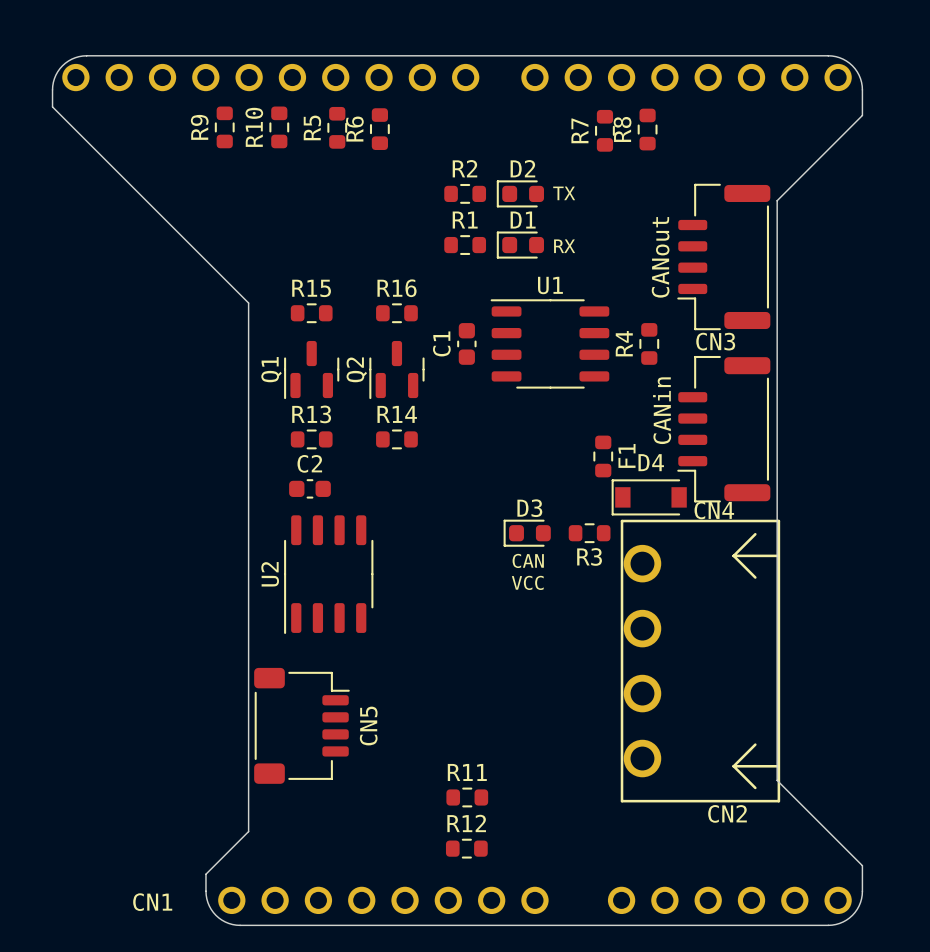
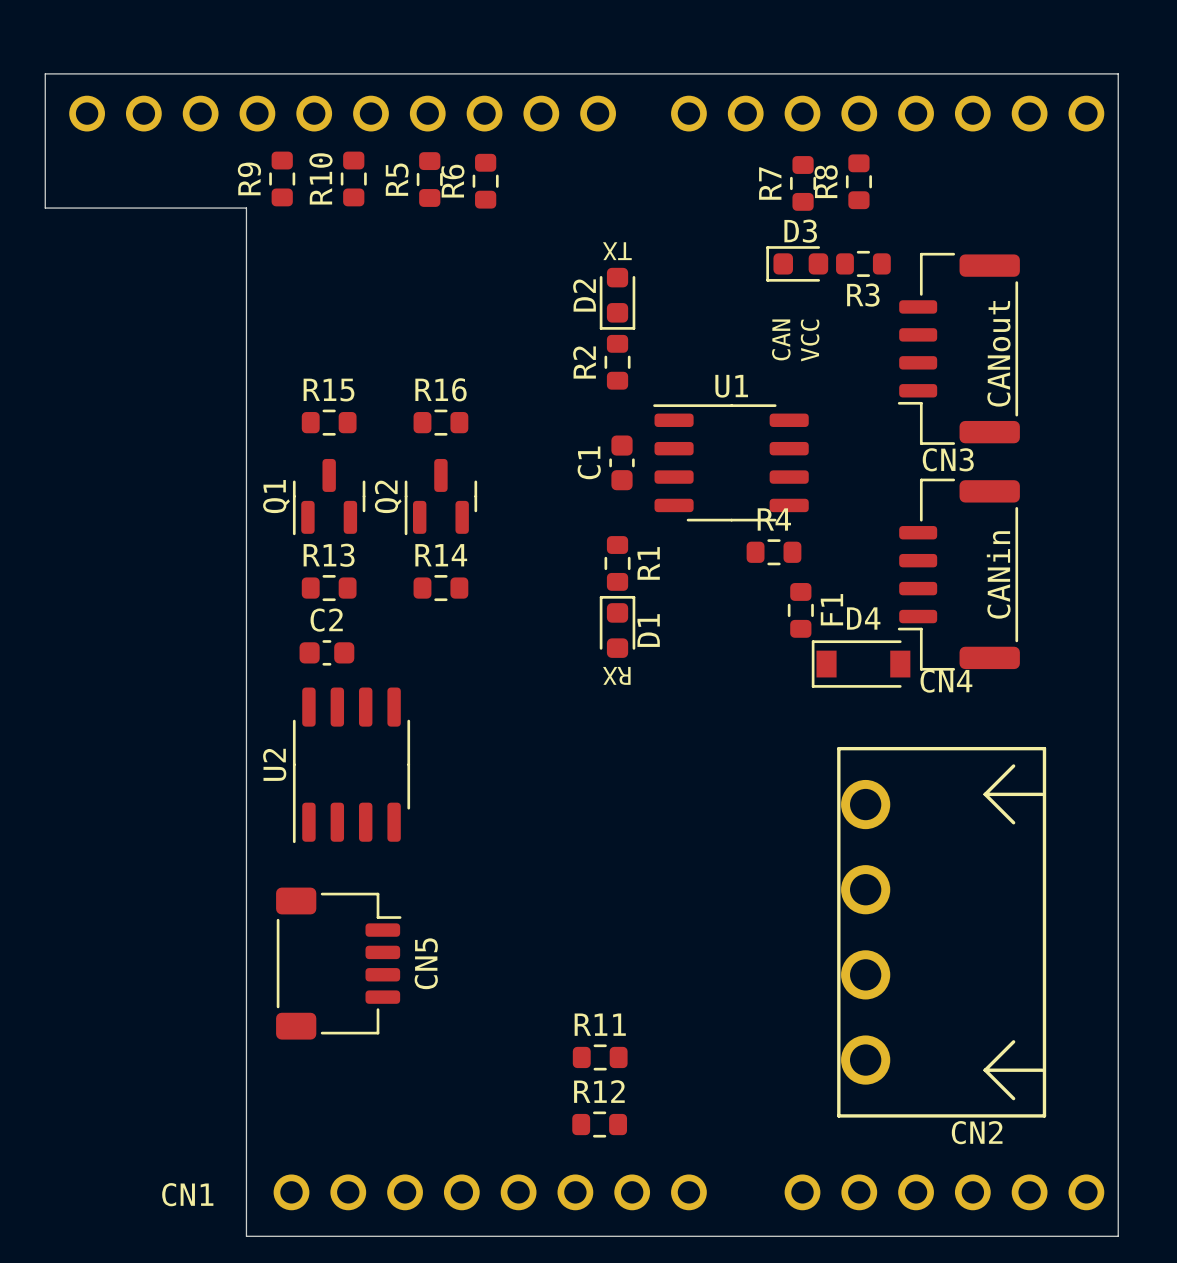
board edge: (862, 89) (859, 75) (852, 65) (839, 57) (828, 55) (86, 55) (75, 57) (62, 65) (54, 78) (52, 89) (52, 106) (248, 303) (248, 831) (205, 874) (206, 898) (215, 915) (228, 923) (240, 925) (828, 925) (839, 923) (852, 915) (859, 906) (862, 891) -> (1118, 129) (1118, 73) (45, 73) (45, 208) (246, 208) (246, 1236) (1118, 1236) (1118, 1180)
board edge: (862, 115) (777, 200) (777, 780) (862, 865) -> (1118, 163) (1118, 1146)
R8 position: (647, 129) -> (858, 181)
R7 position: (604, 130) -> (803, 183)
R2 name position: R2 (464, 168) -> R2 (584, 362)
R2 rotation: 0° (465, 193) -> 90° clockwise (617, 362)
R2 position: (465, 193) -> (617, 362)
D2 rotation: 0° (520, 193) -> 90° counterclockwise (617, 298)
D2 position: (520, 193) -> (617, 298)
text rotation: 0° (564, 193) -> 180° (617, 251)
text position: TX (564, 193) -> TX (617, 251)
R1 rotation: 0° (465, 245) -> 90° clockwise (617, 563)
R1 position: (465, 245) -> (617, 563)
D1 rotation: 0° (520, 245) -> 90° clockwise (617, 626)
D1 position: (520, 245) -> (617, 626)
text rotation: 0° (564, 246) -> 180° (616, 675)
text position: RX (564, 246) -> RX (616, 675)
CN3 position: (723, 256) -> (958, 348)
text position: CANout (660, 257) -> CANout (998, 353)
R15 position: (311, 313) -> (329, 422)
R16 position: (396, 313) -> (440, 422)
C1 position: (466, 343) -> (621, 462)
U1 position: (549, 343) -> (730, 462)
R4 rotation: 0° (649, 343) -> 90° clockwise (774, 552)
R4 position: (649, 343) -> (774, 552)
Q1 position: (311, 370) -> (329, 497)
Q2 position: (396, 370) -> (440, 497)
text position: CANin (662, 410) -> CANin (998, 574)
CN4 position: (723, 429) -> (958, 574)
R13 position: (311, 439) -> (329, 588)
R14 position: (396, 439) -> (440, 588)
F1 position: (603, 456) -> (800, 610)
C2 position: (309, 488) -> (326, 652)
D4 position: (649, 497) -> (861, 664)
D3 position: (527, 533) -> (797, 263)
R3 position: (589, 533) -> (863, 263)
text rotation: 0° (528, 560) -> 90° counterclockwise (781, 339)
text position: CAN (528, 560) -> CAN (781, 339)
U2 position: (328, 574) -> (351, 765)
text rotation: 0° (527, 582) -> 90° counterclockwise (810, 340)
text position: VCC (527, 582) -> VCC (810, 340)
CN2 position: (700, 661) -> (941, 932)
CN5 position: (301, 725) -> (338, 963)

